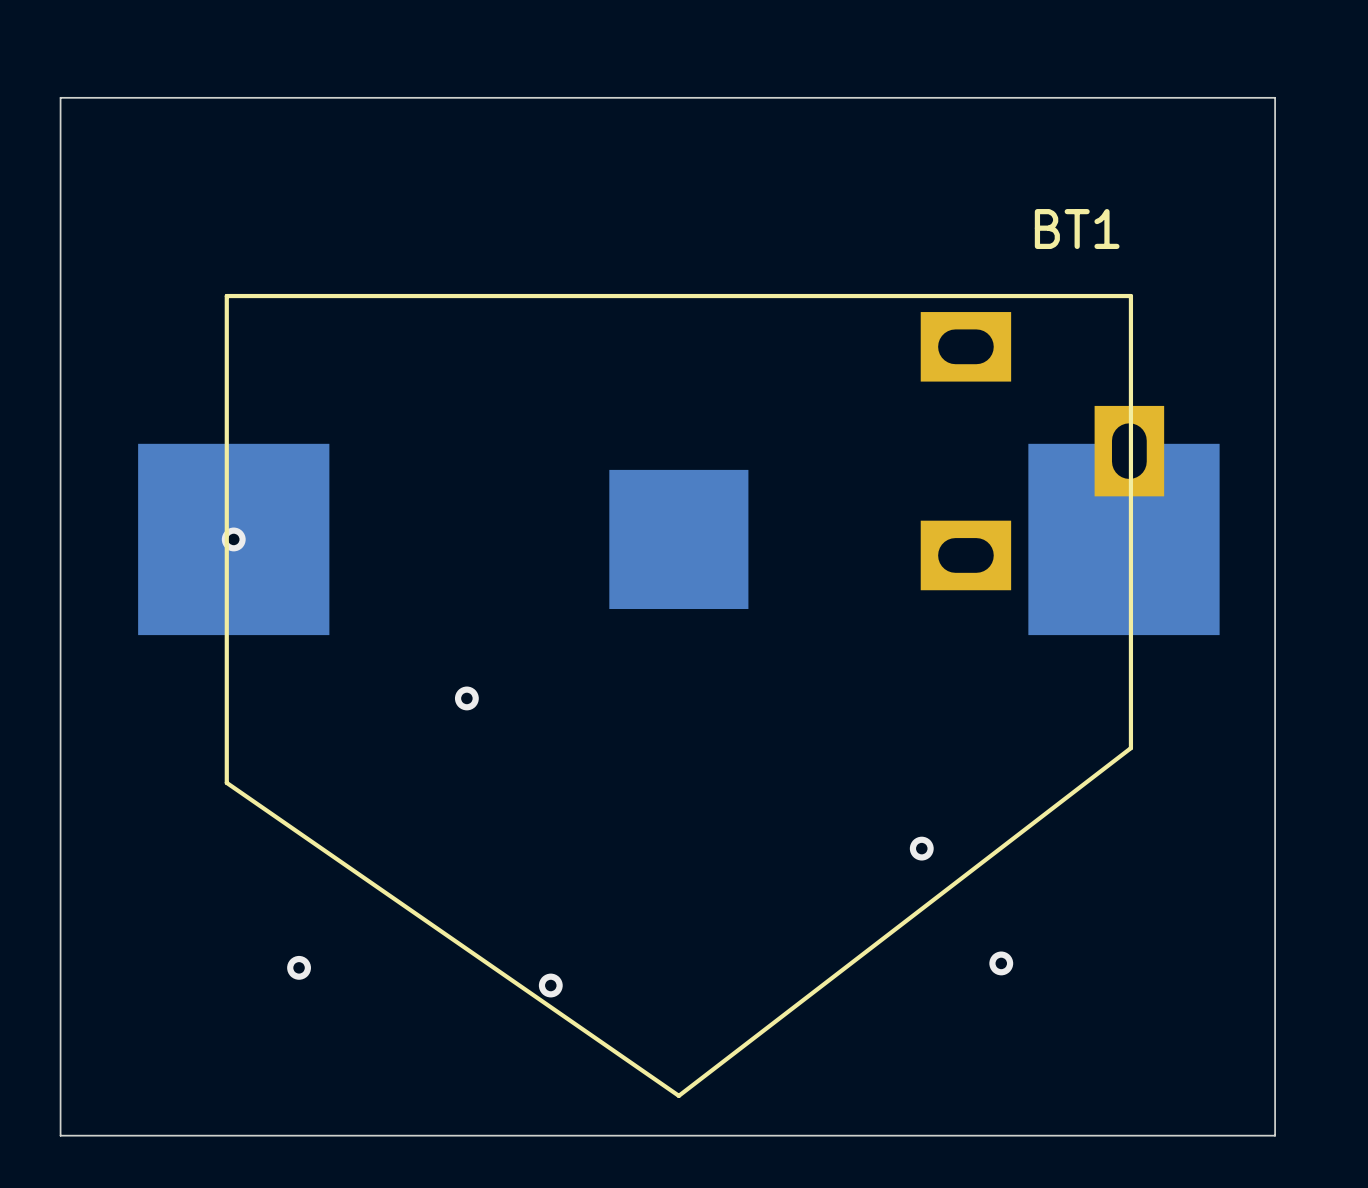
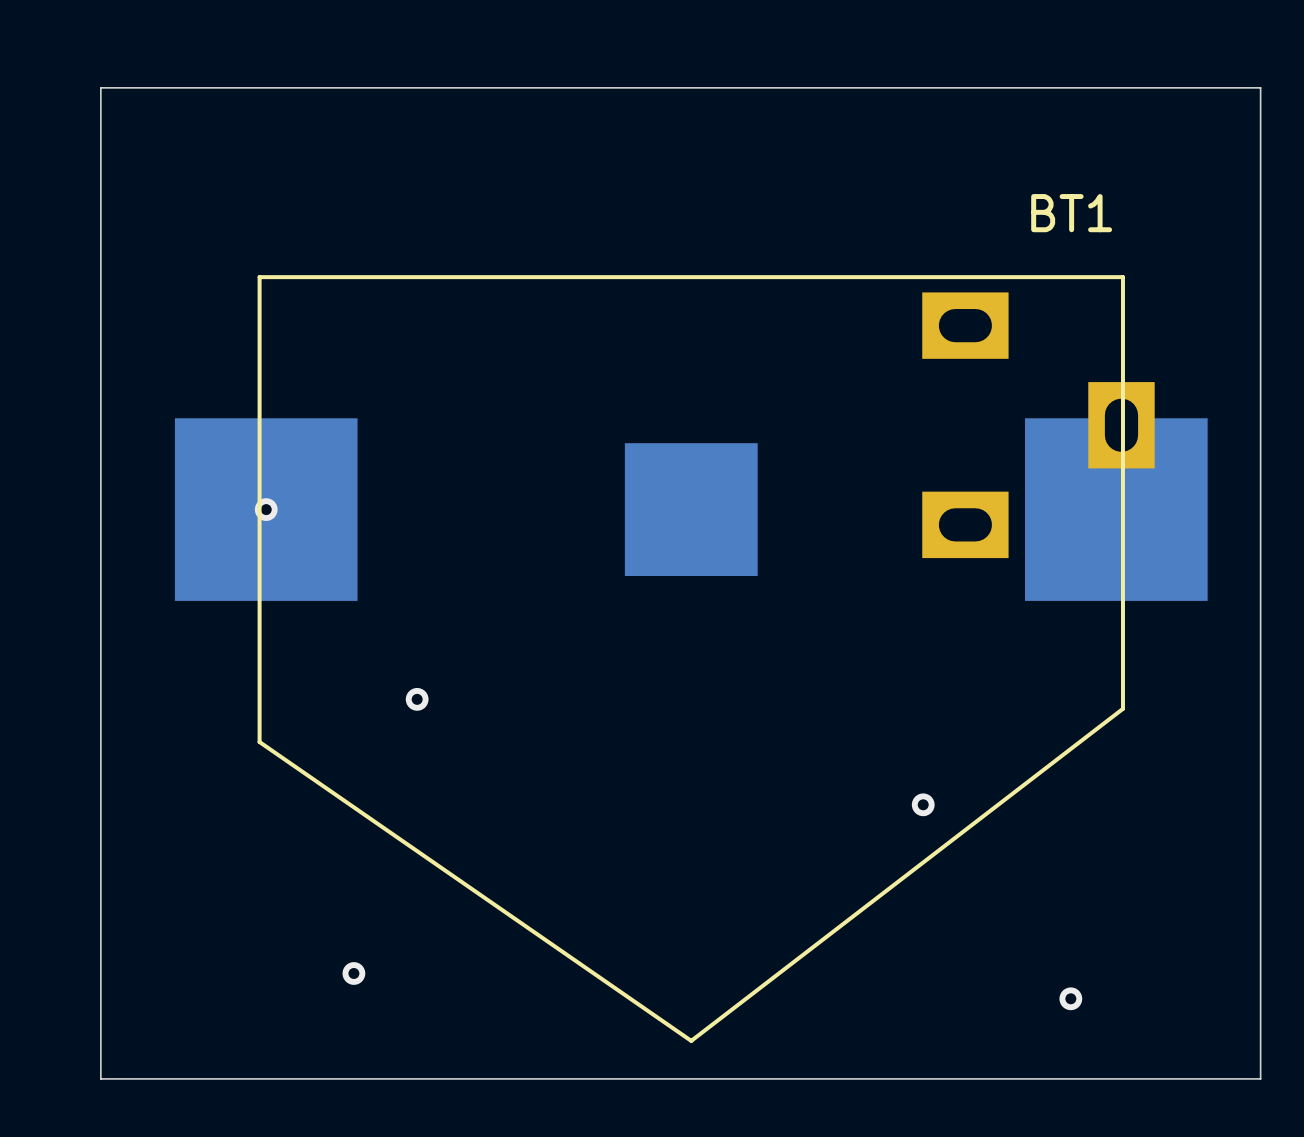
via position: (466, 698) -> (417, 699)
via position: (1001, 963) -> (1070, 998)
via position: (299, 967) -> (353, 973)
via: (550, 985) -> none

